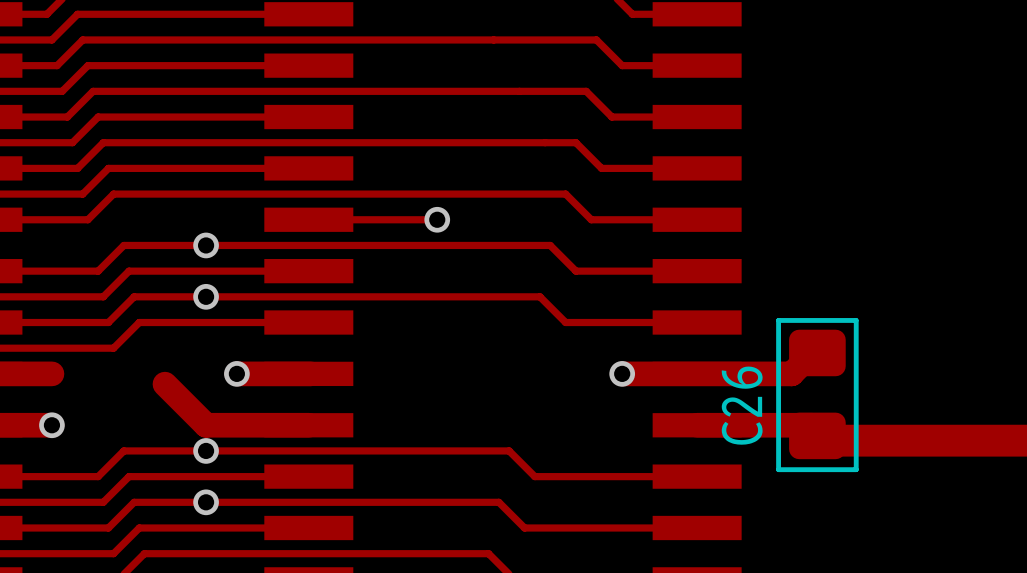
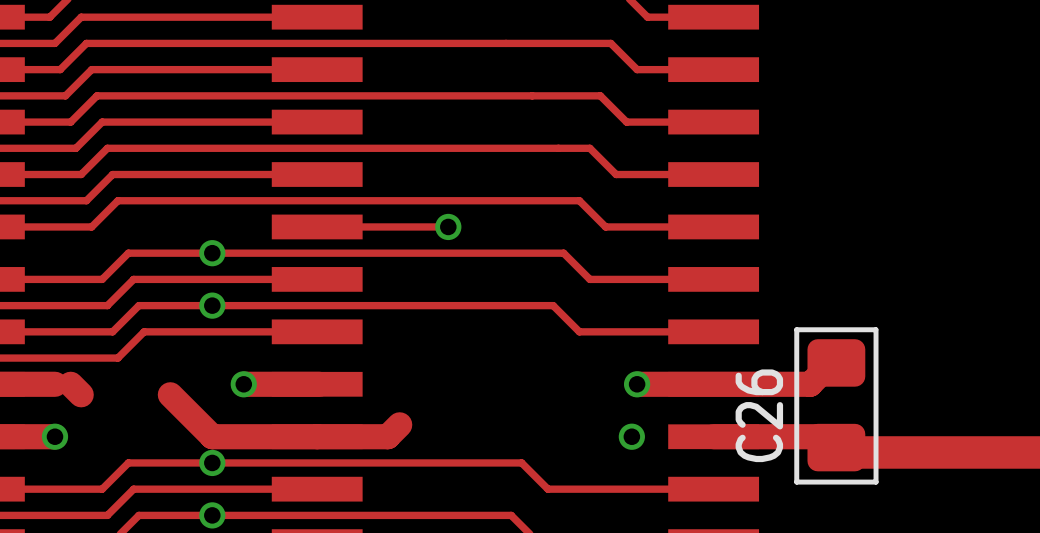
track: none -> (70, 384) (81, 394)
track: none -> (399, 424) (387, 436) (317, 436)
via: none -> (631, 436)

